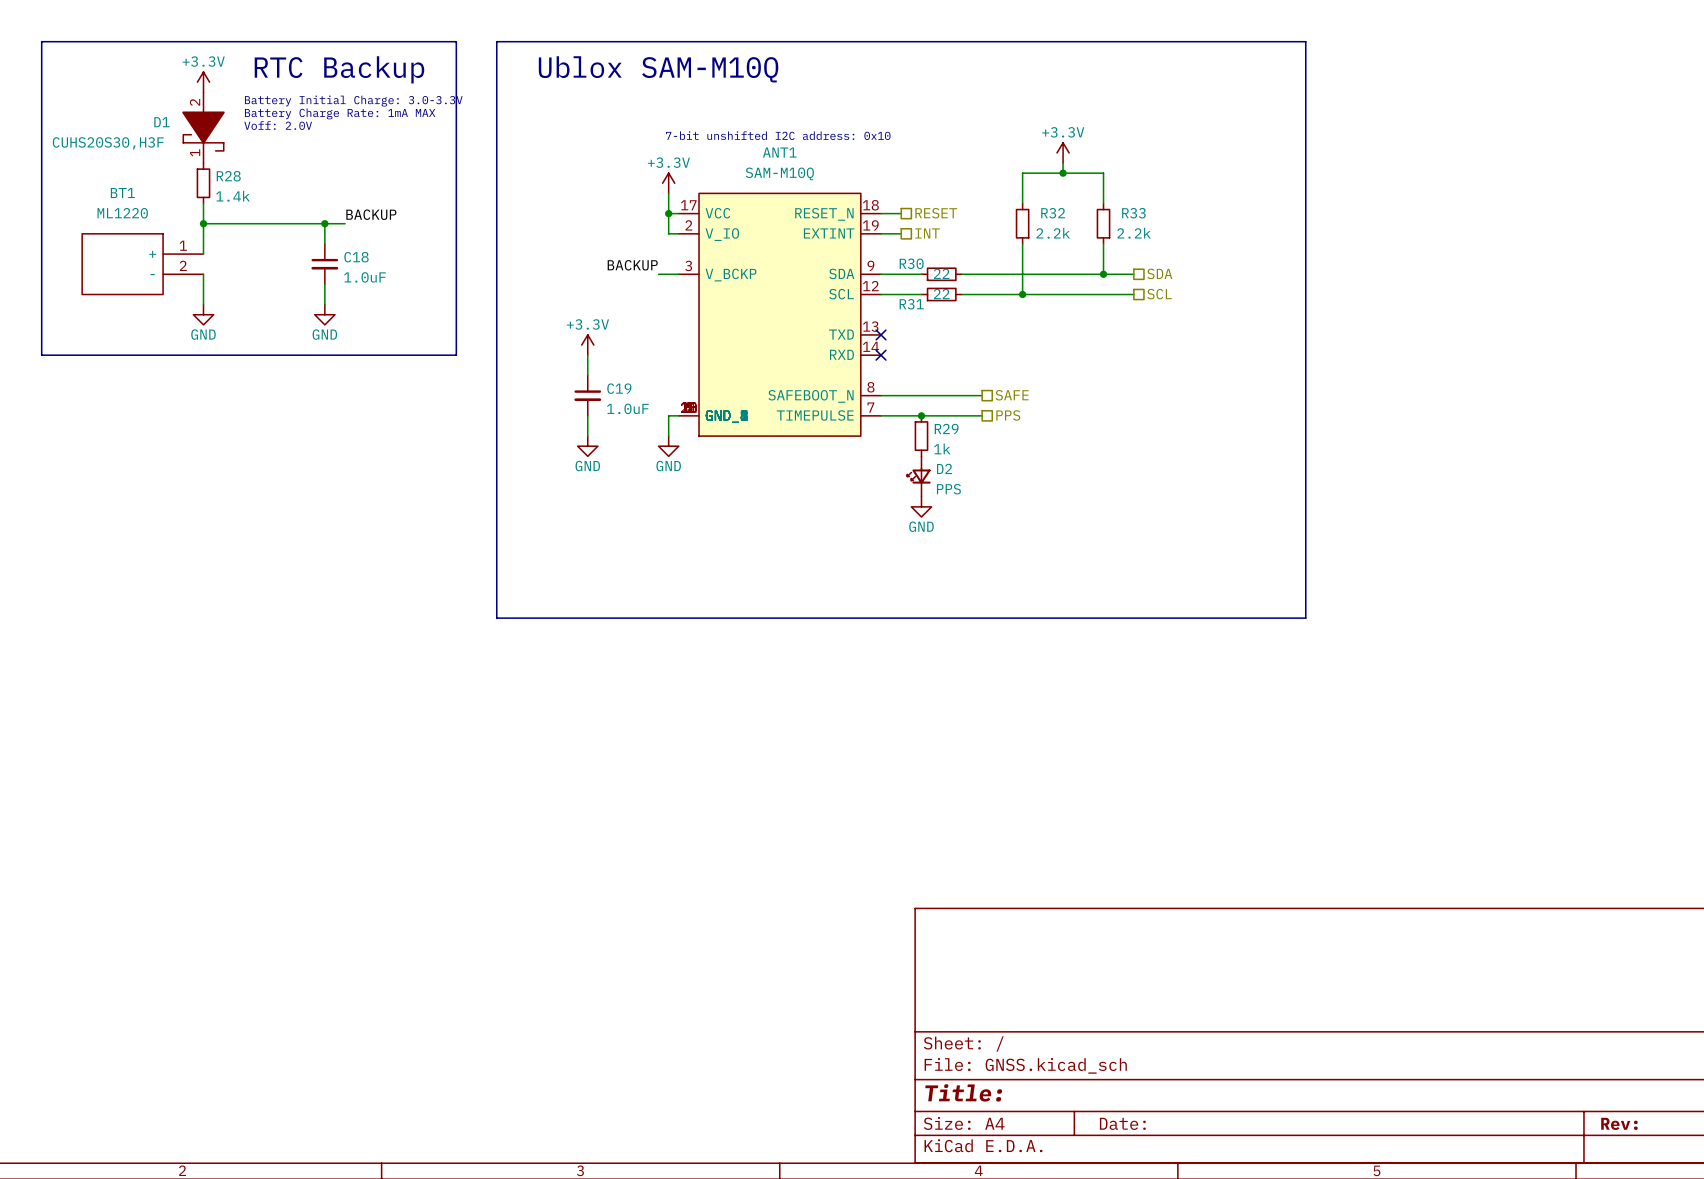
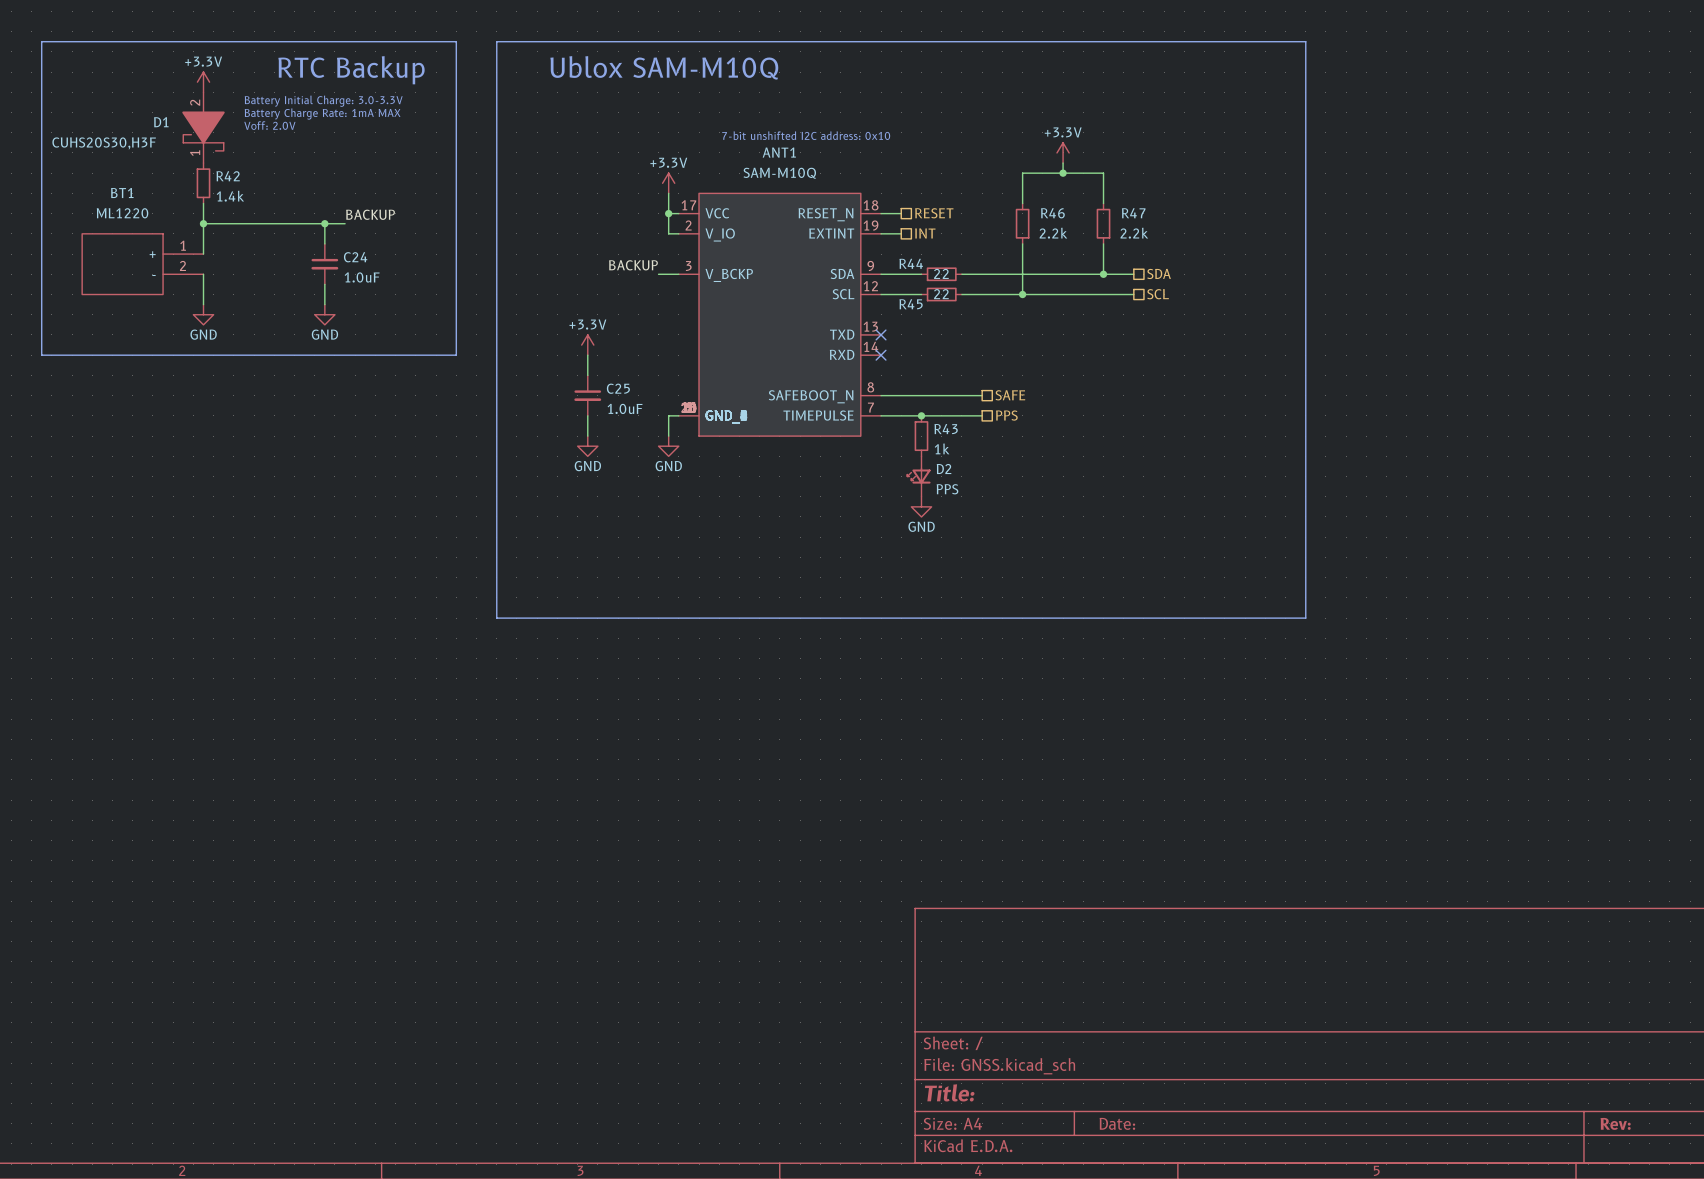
R28 name: R28 (228, 176) -> R42 (228, 176)
R32 name: R32 (1053, 213) -> R46 (1052, 213)
R33 name: R33 (1133, 213) -> R47 (1133, 213)
C18 name: C18 (356, 257) -> C24 (355, 257)
R30 name: R30 (911, 263) -> R44 (911, 263)
R31 name: R31 (911, 304) -> R45 (911, 304)
C19 name: C19 (619, 388) -> C25 (618, 388)
R29 name: R29 (946, 428) -> R43 (946, 429)

